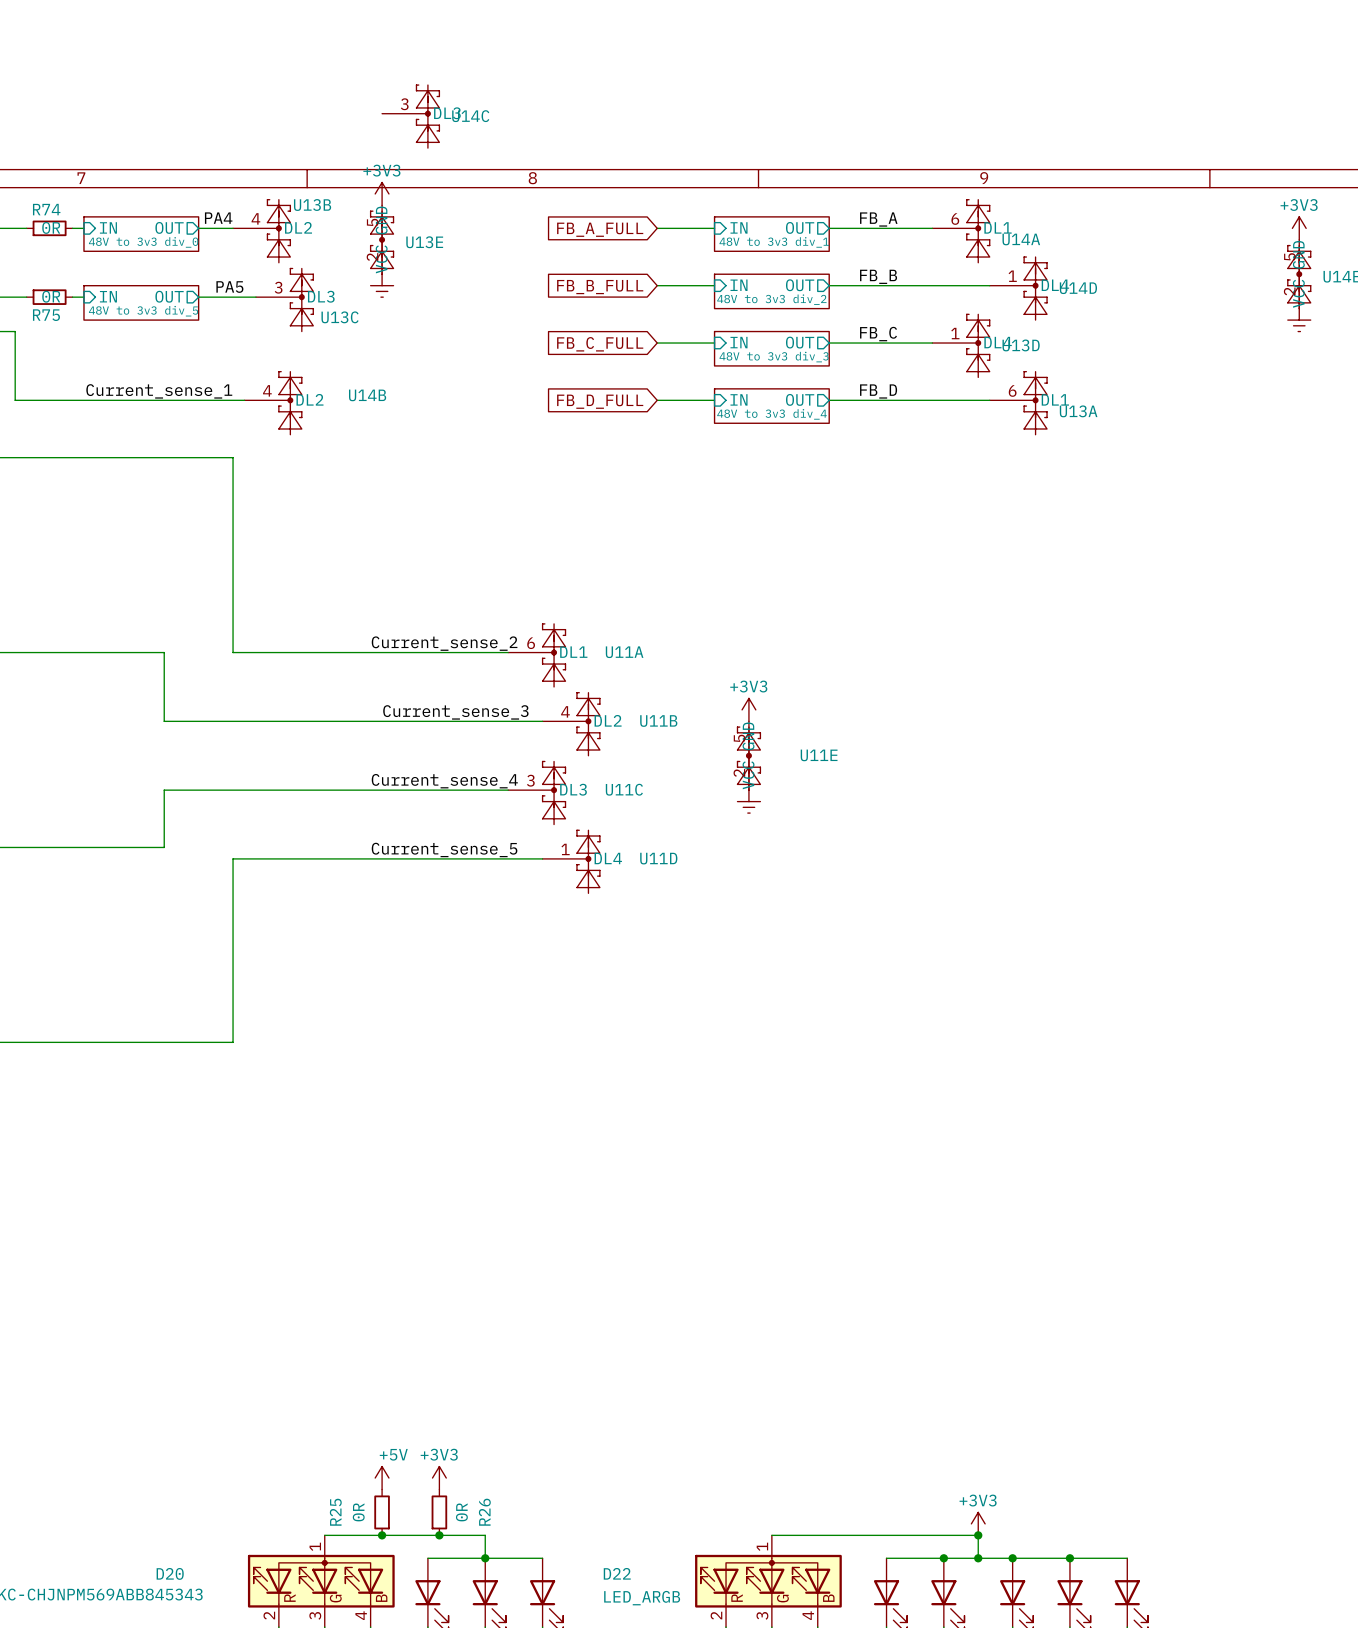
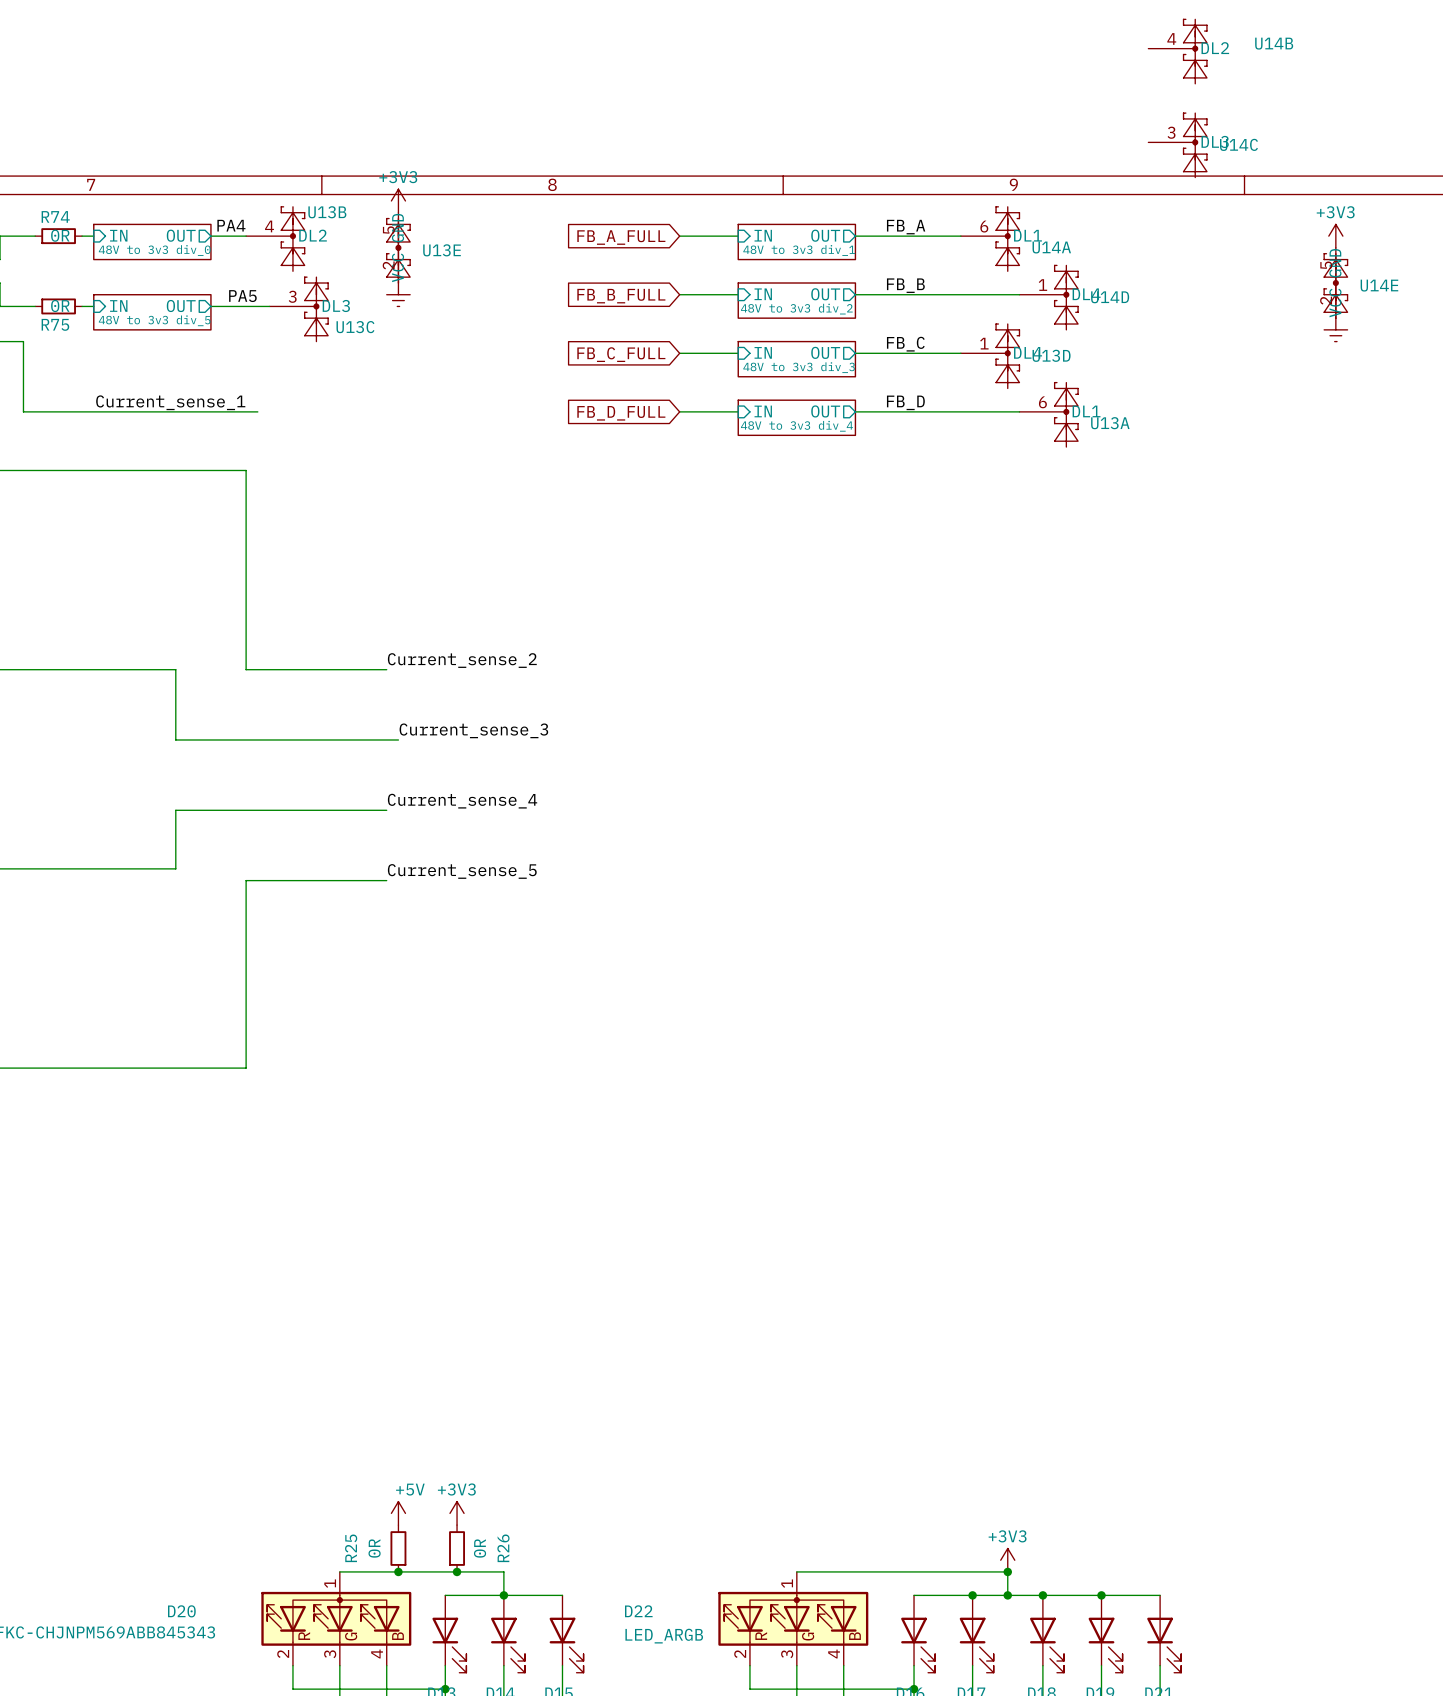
U14C position: (410, 116) -> (1177, 145)
U14B position: (273, 403) -> (1177, 51)
wire: (370, 652) (508, 652) -> none
U11A: (536, 664) -> none
power symbol: +3V3 (748, 709) -> none
wire: (382, 721) (542, 721) -> none
U11B: (571, 724) -> none
U11E: (748, 755) -> none
wire: (370, 790) (508, 790) -> none
U11C: (536, 793) -> none
power symbol: (748, 801) -> none
wire: (370, 858) (542, 858) -> none
U11D: (571, 861) -> none

